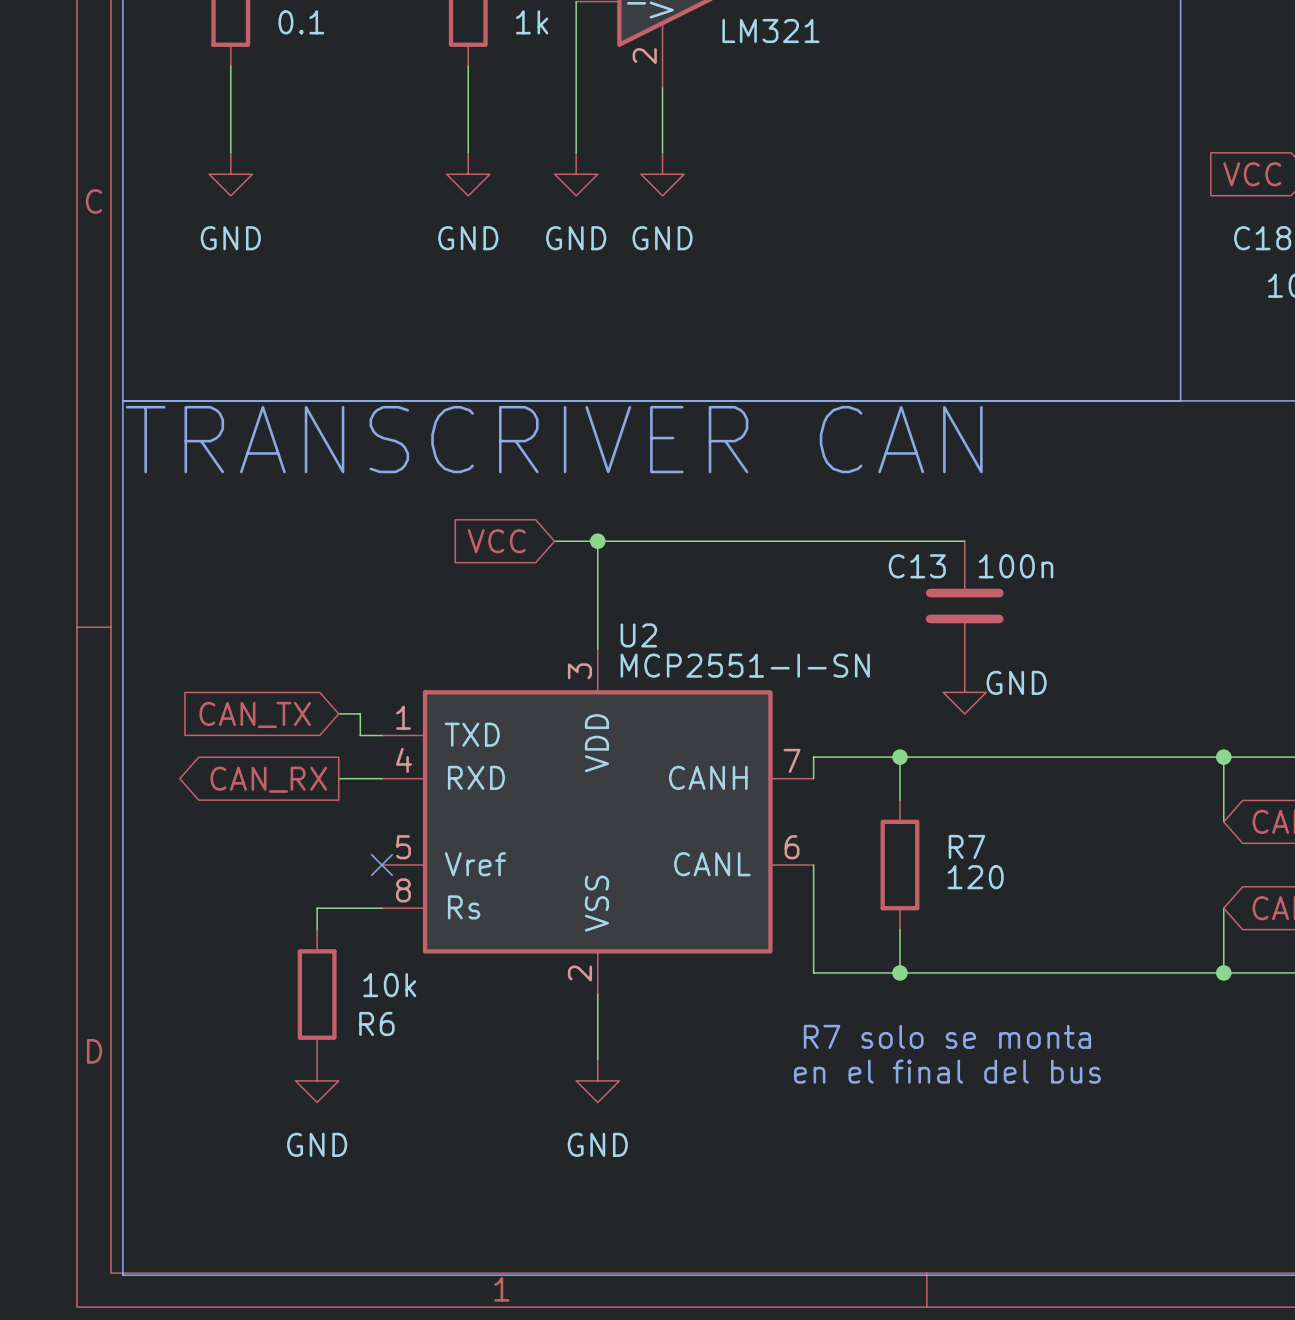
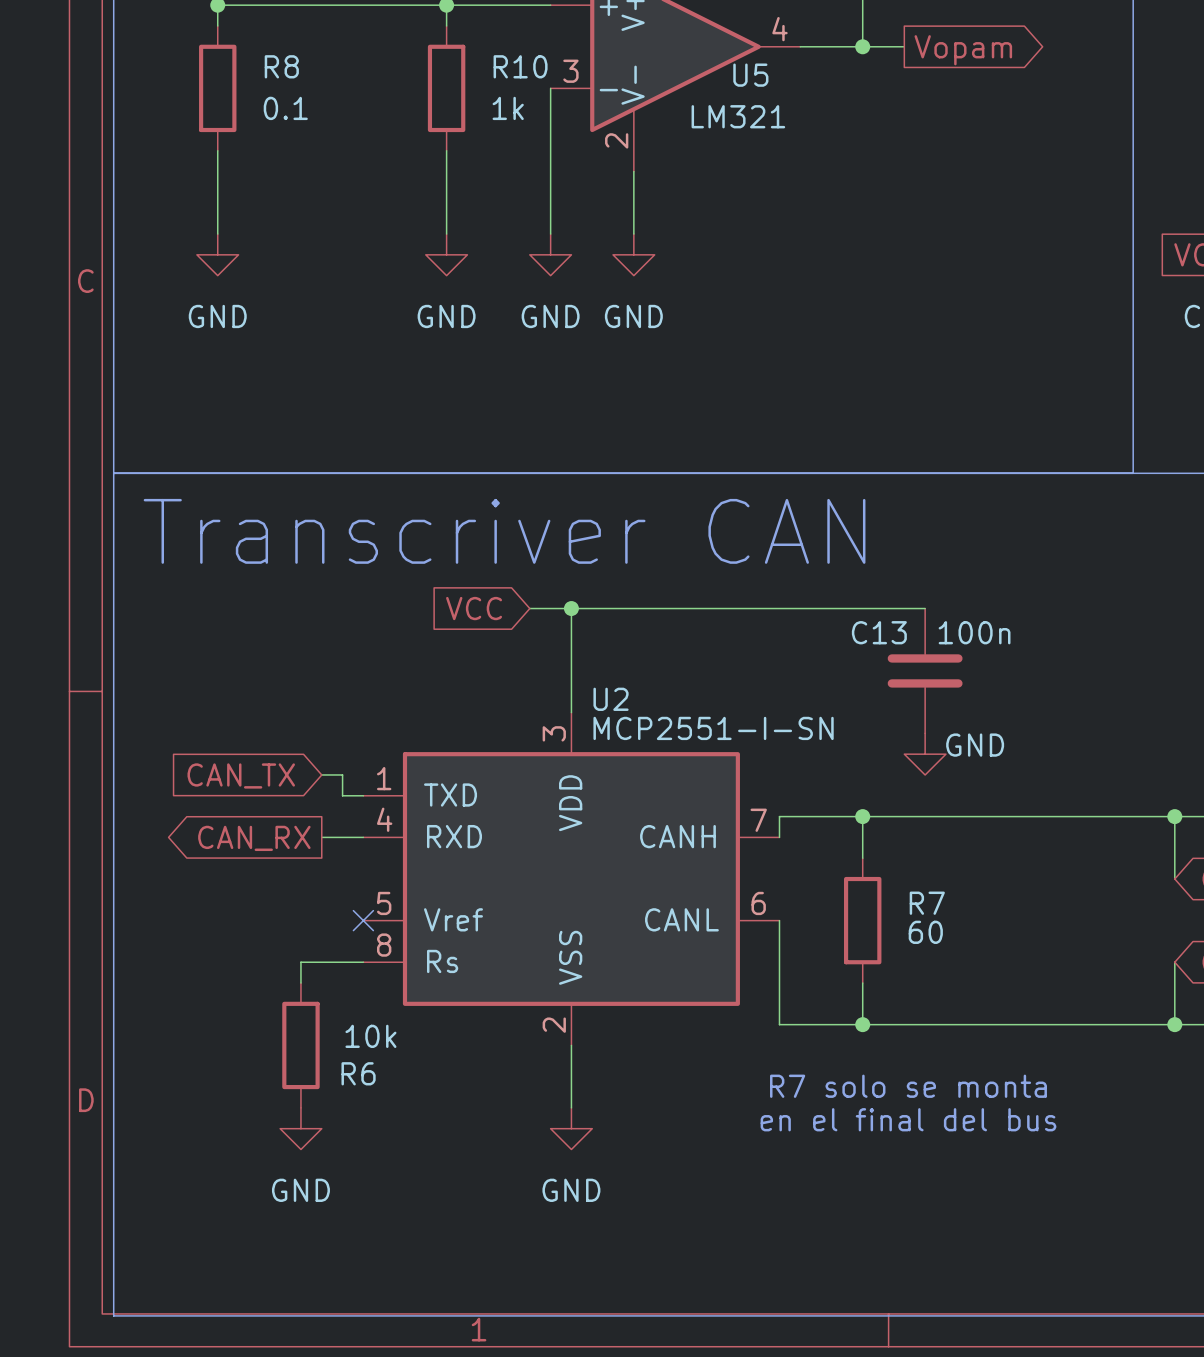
text: TRANSCRIVER CAN (554, 439) -> none
text: none -> Transcriver CAN (504, 531)
R7 value: 120 (975, 877) -> 60 (925, 932)

